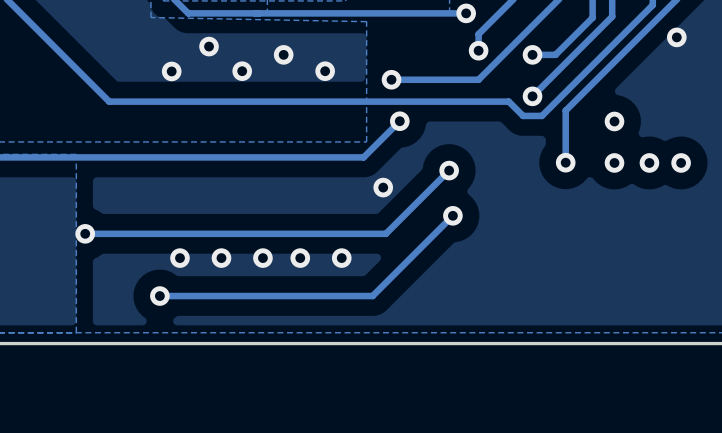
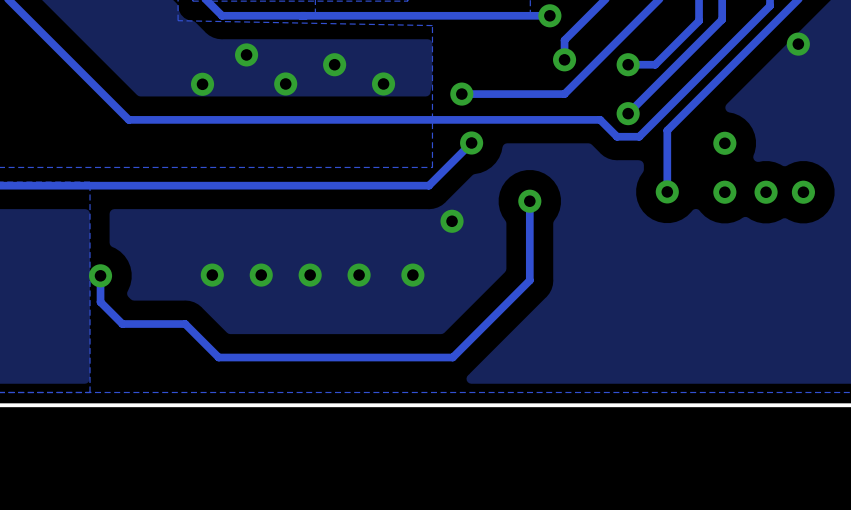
track: (449, 170) (385, 233) (85, 233) -> (529, 201) (529, 280) (452, 357) (218, 357) (185, 324) (122, 324) (100, 302) (100, 275)
track: (452, 215) (372, 296) (159, 296) -> none
via: (452, 215) -> none
via: none -> (212, 275)
via: none -> (261, 275)
via: none -> (310, 275)
via: none -> (359, 275)
via: none -> (412, 275)
via: (180, 258) -> none
via: (221, 258) -> none
via: (262, 258) -> none
via: (300, 258) -> none
via: (341, 258) -> none
via: (159, 296) -> none

